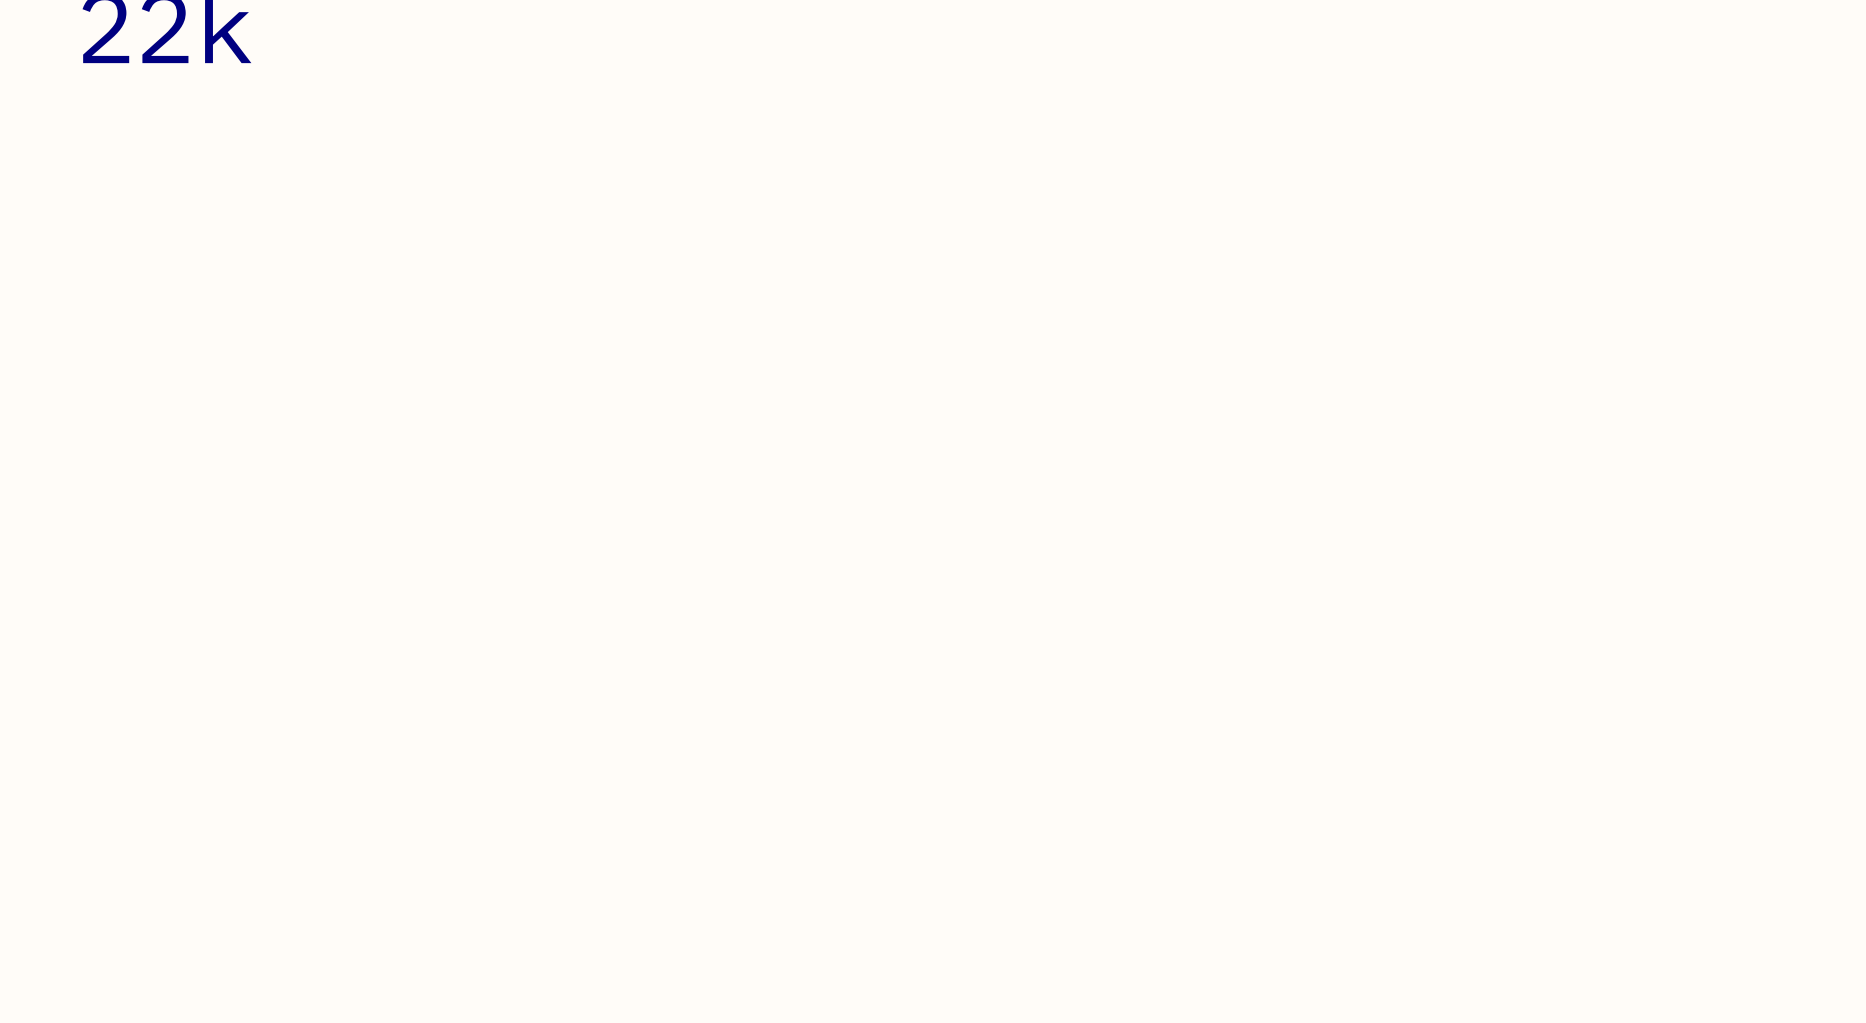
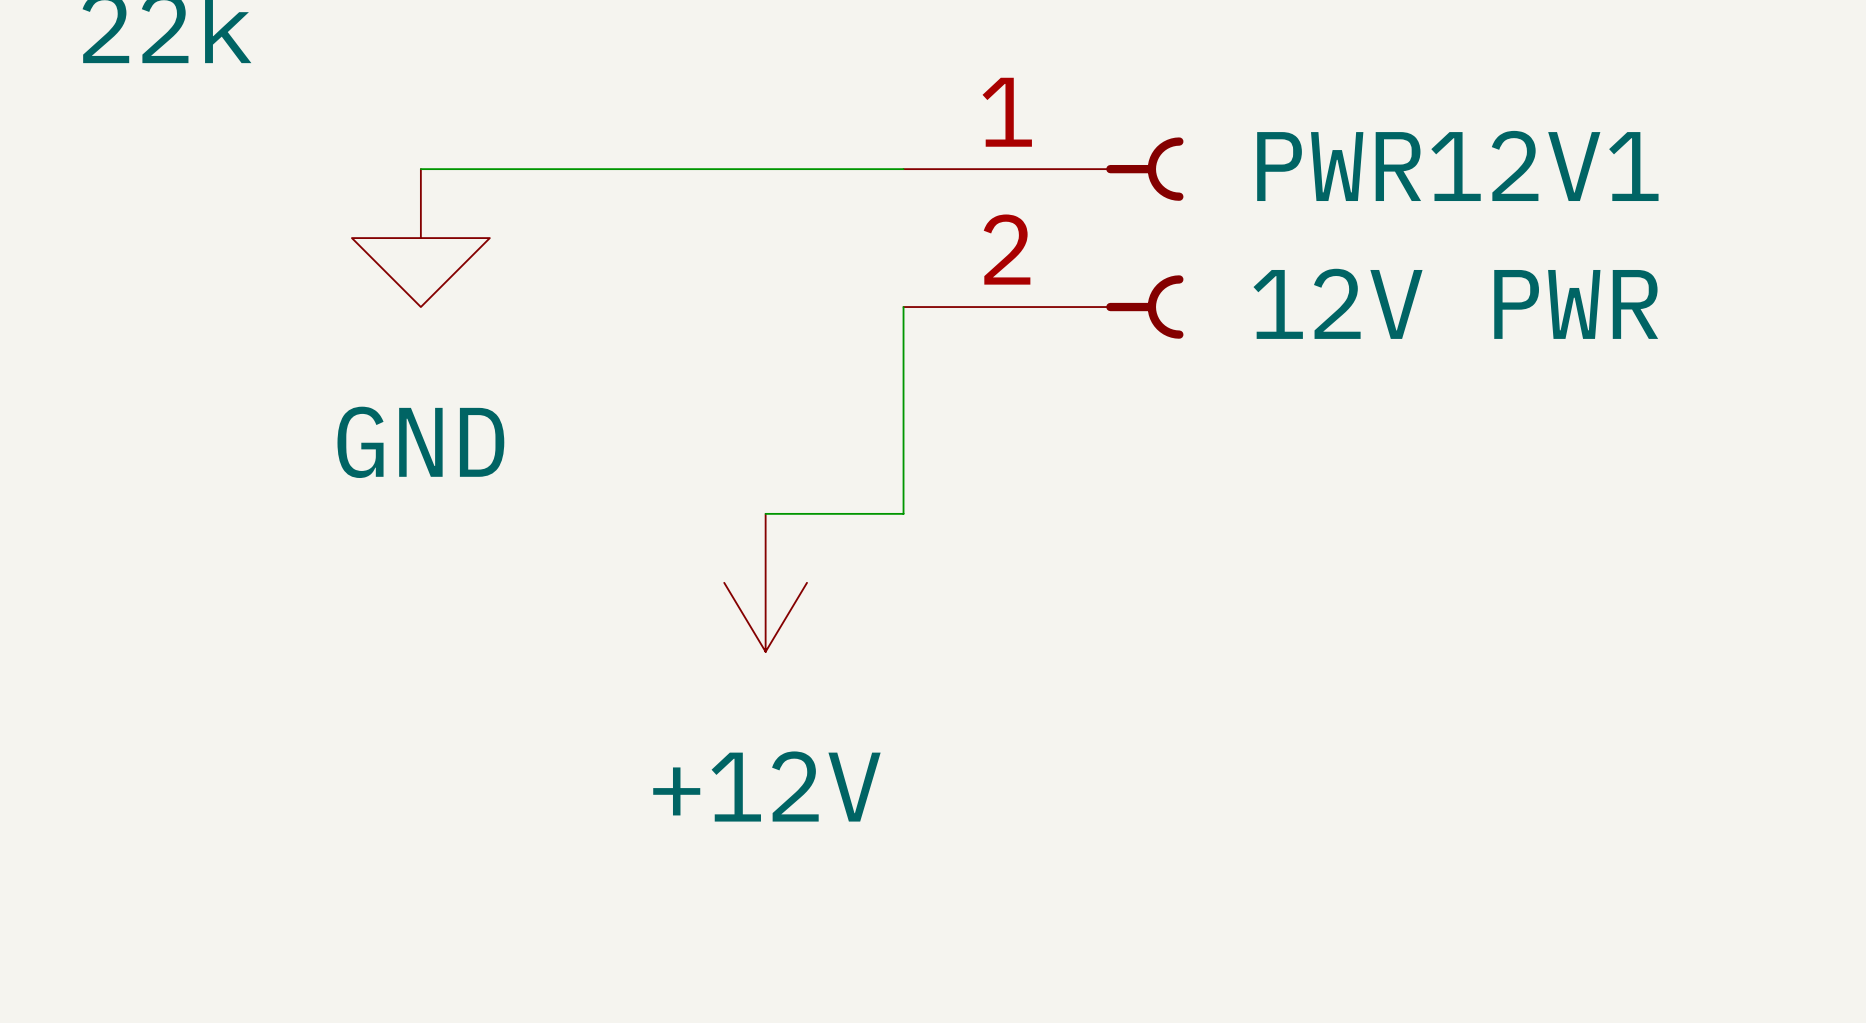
wire: none -> (420, 169) (903, 169)
power symbol: none -> GND (420, 238)
PWR12V1: none -> 12V PWR (1043, 238)
wire: none -> (903, 307) (903, 513) (765, 513)
power symbol: none -> +12V (765, 582)

